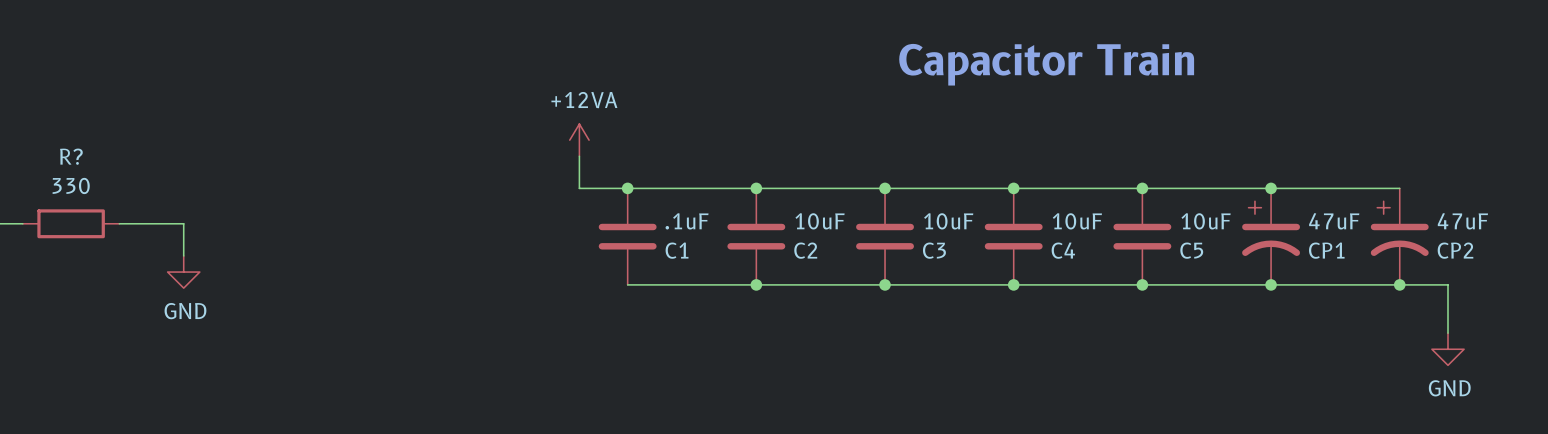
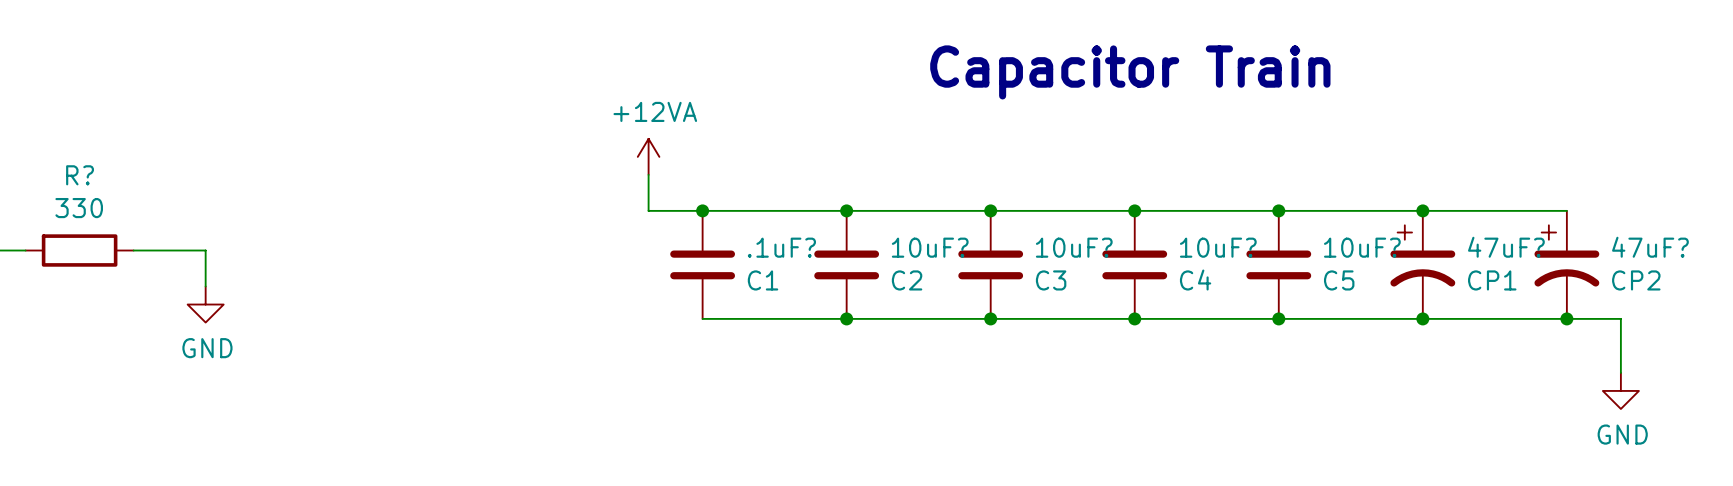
.1uF name: .1uF (687, 221) -> .1uF? (781, 247)
10uF name: 10uF (820, 221) -> 10uF? (930, 247)
10uF name: 10uF (948, 221) -> 10uF? (1074, 247)
10uF name: 10uF (1077, 221) -> 10uF? (1218, 247)
10uF name: 10uF (1206, 221) -> 10uF? (1362, 247)
47uF name: 47uF (1334, 221) -> 47uF? (1506, 247)
47uF name: 47uF (1462, 221) -> 47uF? (1650, 247)

